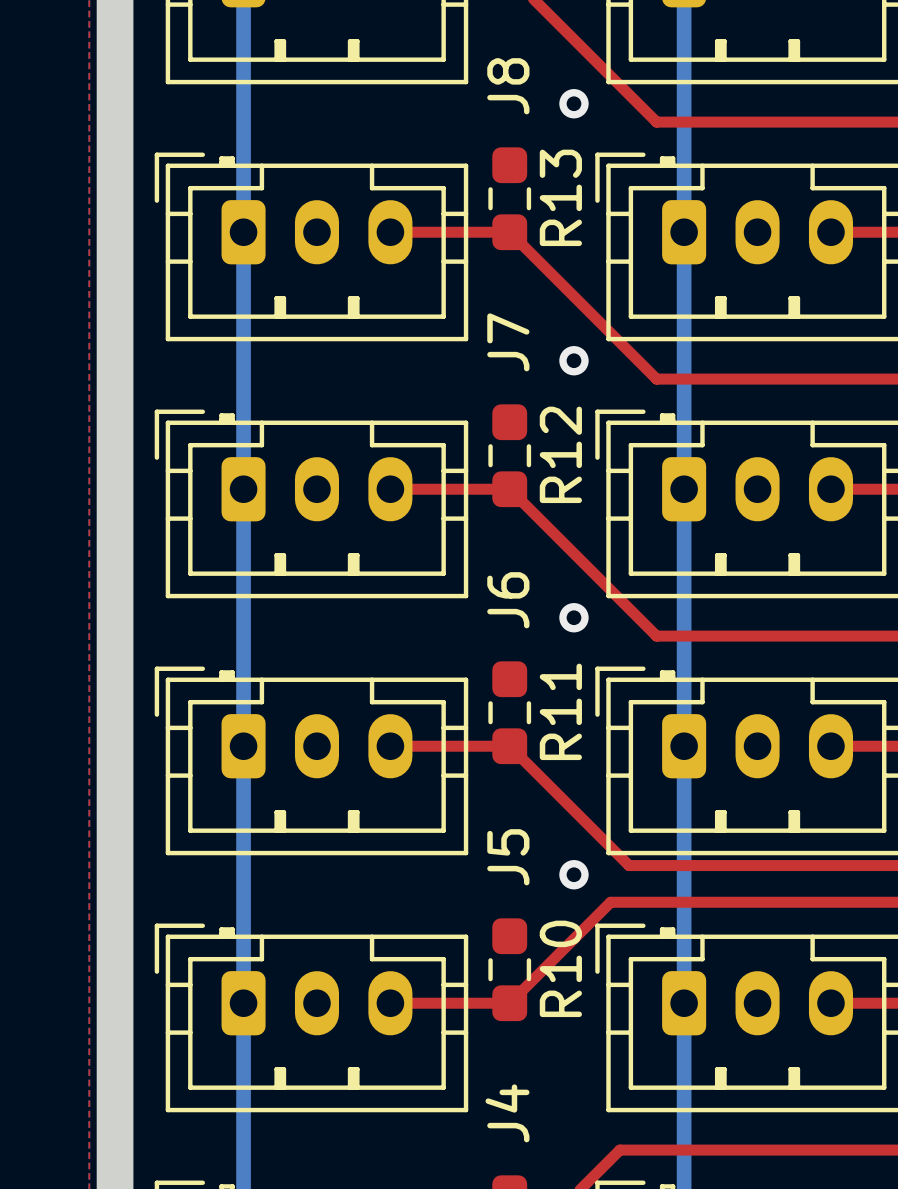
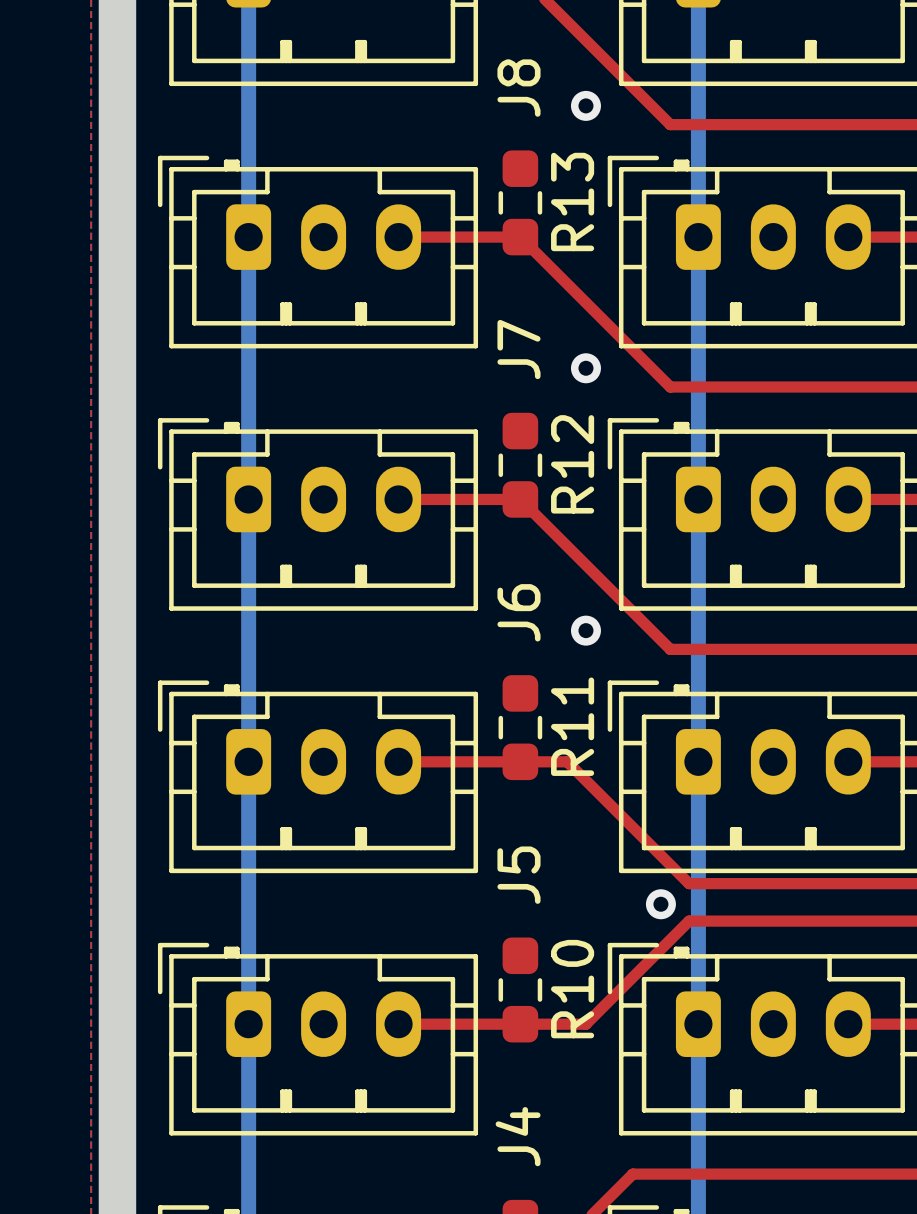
top track: (509, 746) (629, 865) (674, 865) -> (520, 761) (567, 761) (689, 883)
via position: (573, 874) -> (660, 904)
top track: (674, 902) (610, 902) (509, 1003) -> (689, 921) (585, 1024) (520, 1024)

